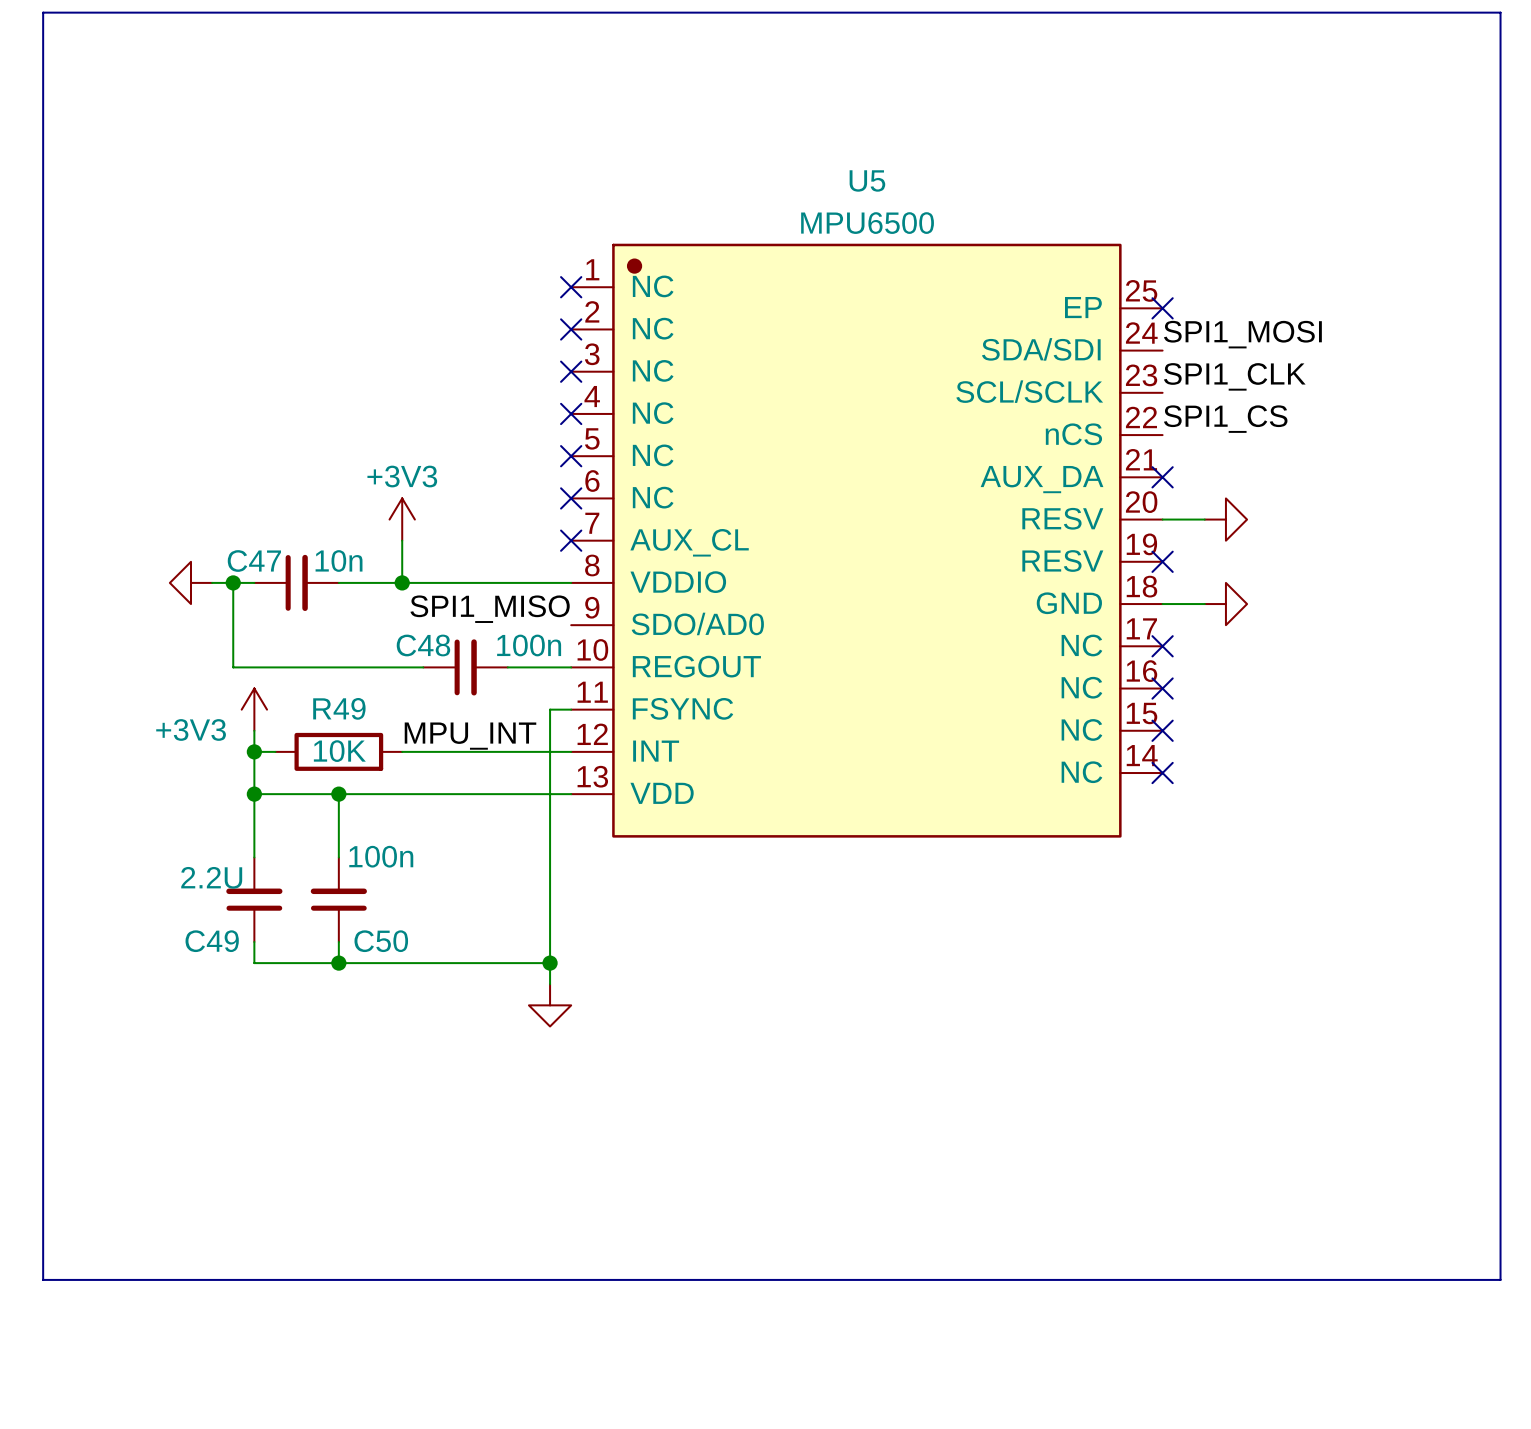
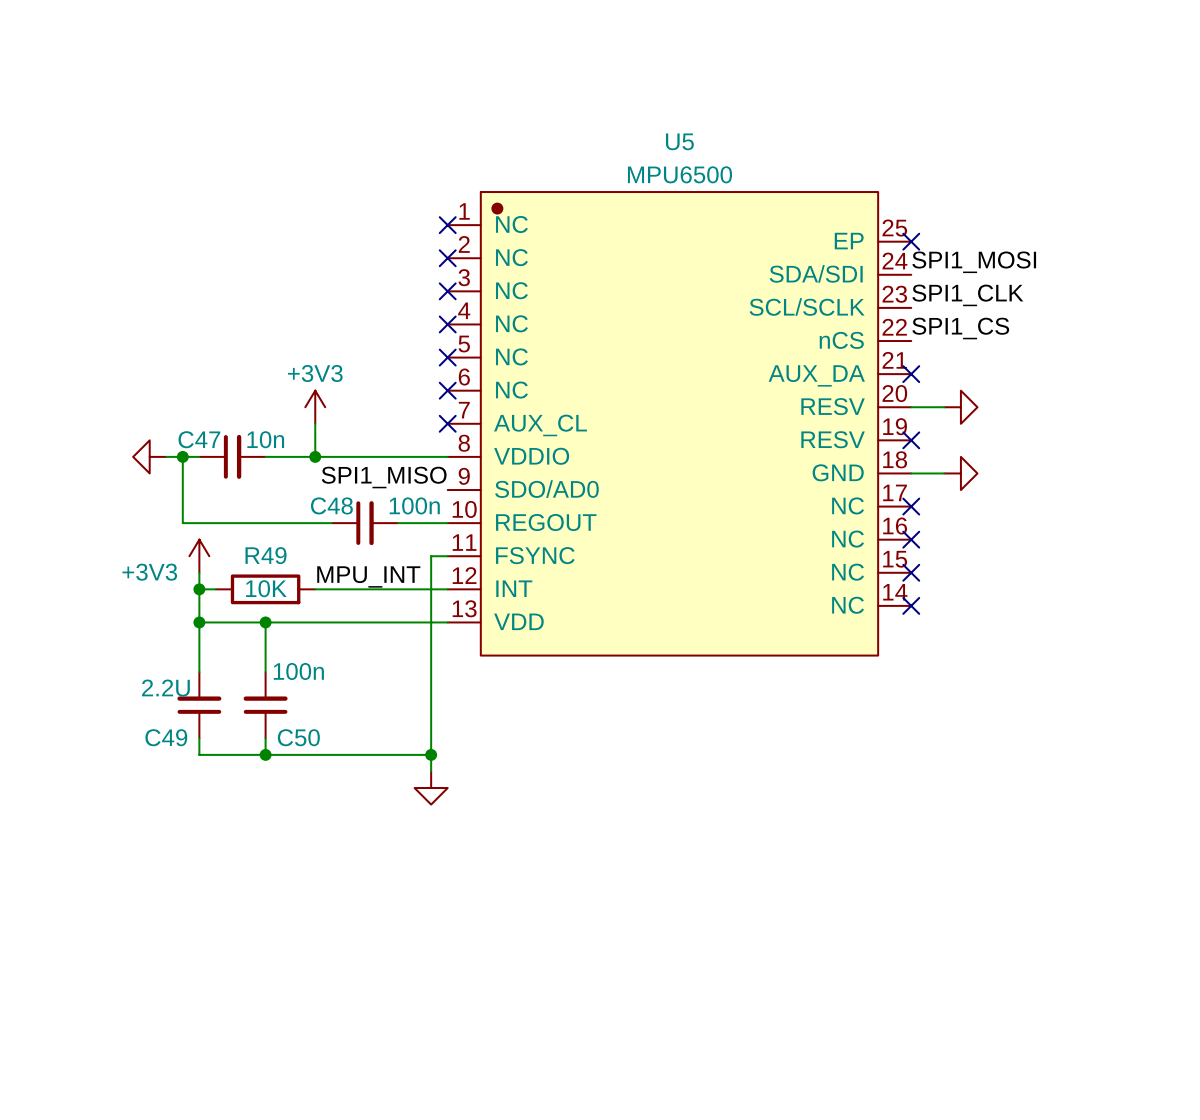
line: (43, 12) (1500, 12) (1500, 1279) (43, 1279) (43, 12) -> none

